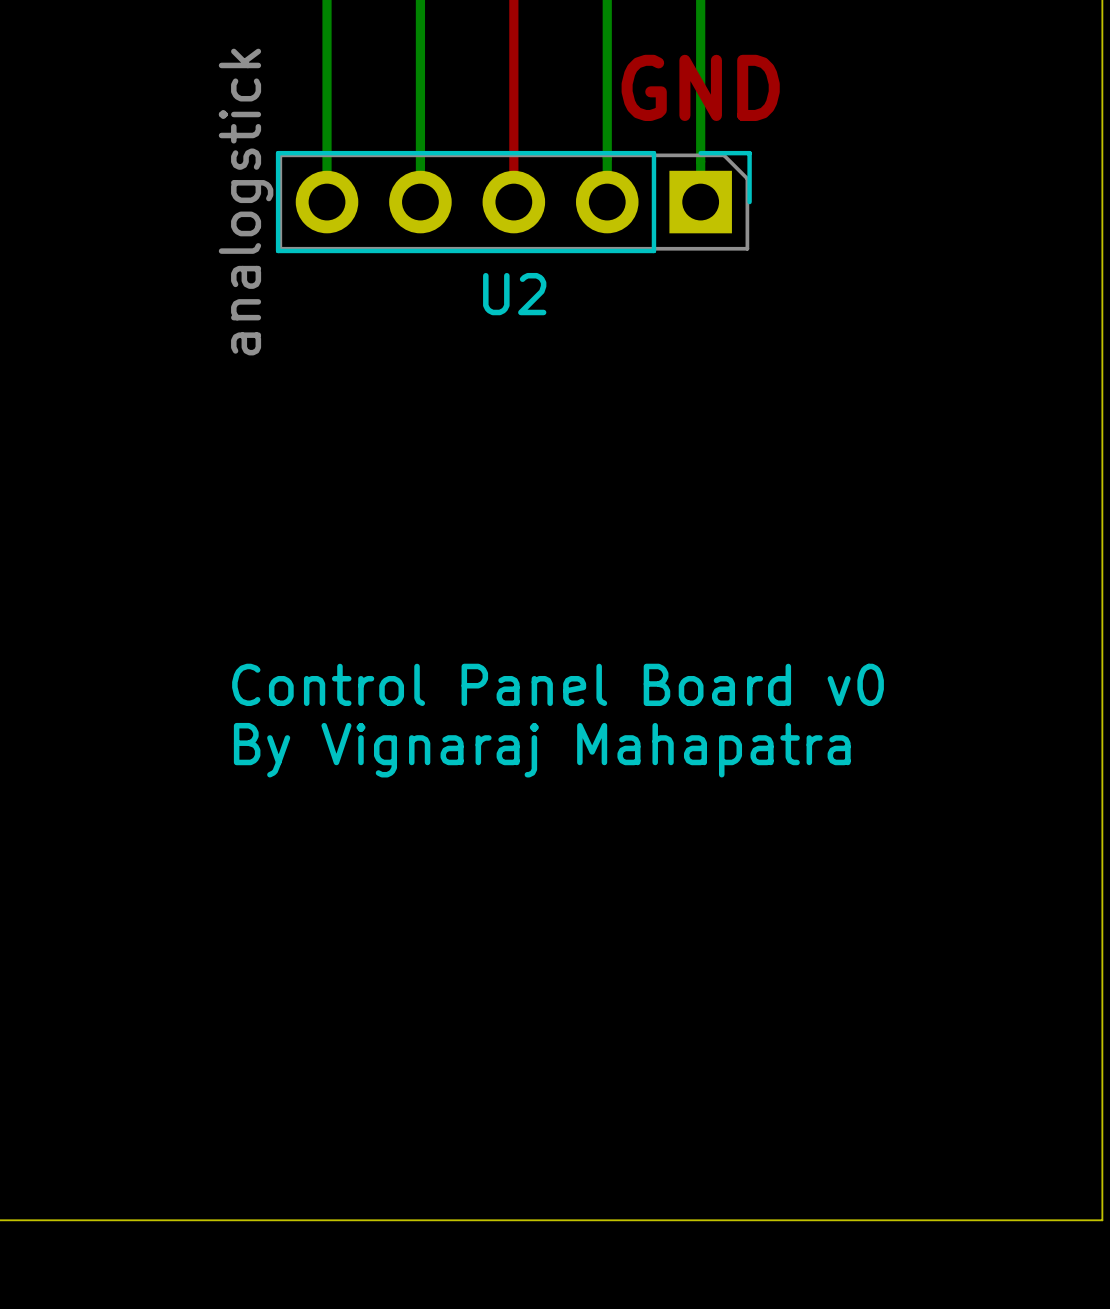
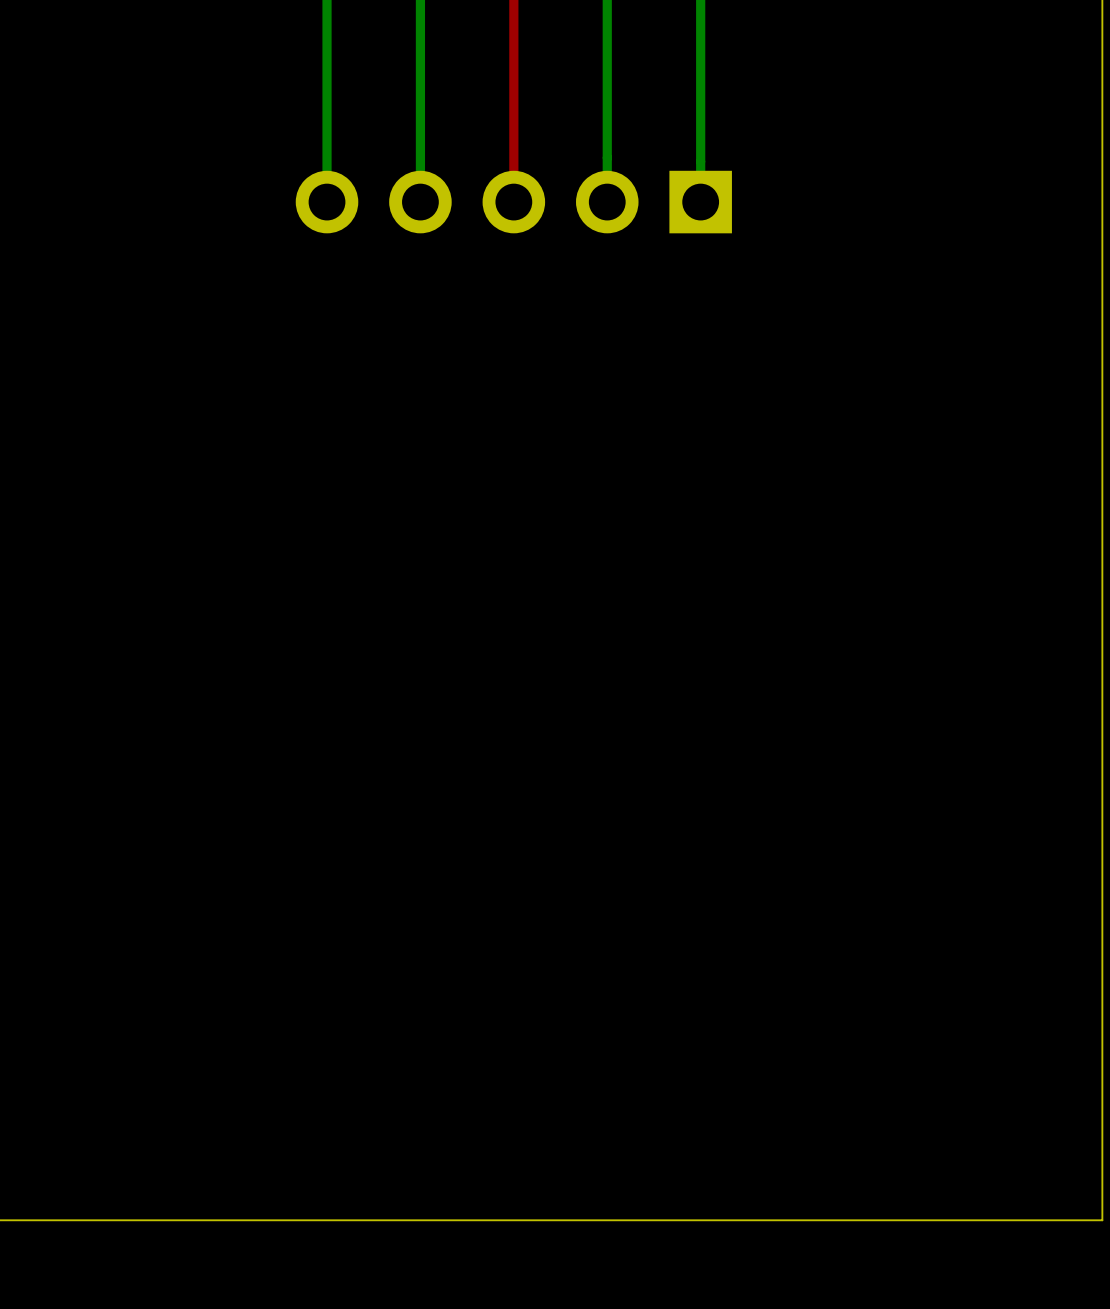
text: GND (700, 87) -> none
U2 side: top (513, 202) -> bottom (513, 202)
text: Control Panel Board v0 (558, 684) -> none
text: By Vignaraj Mahapatra (542, 750) -> none

